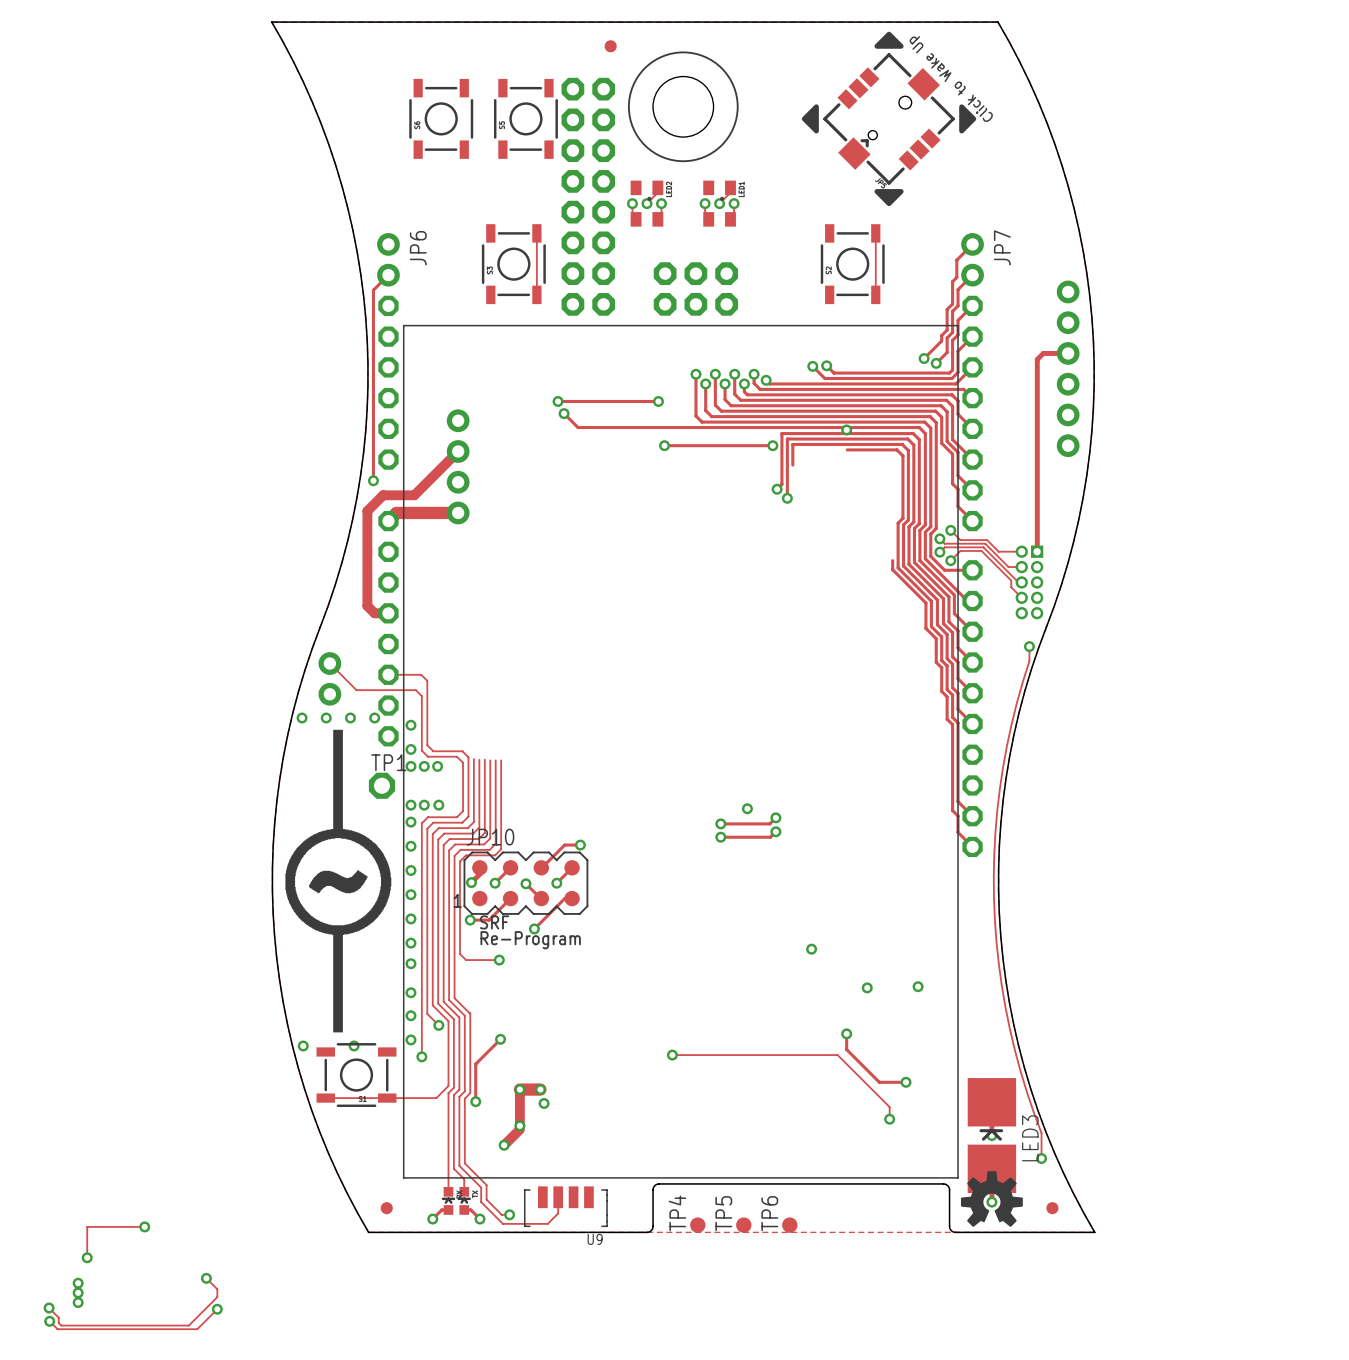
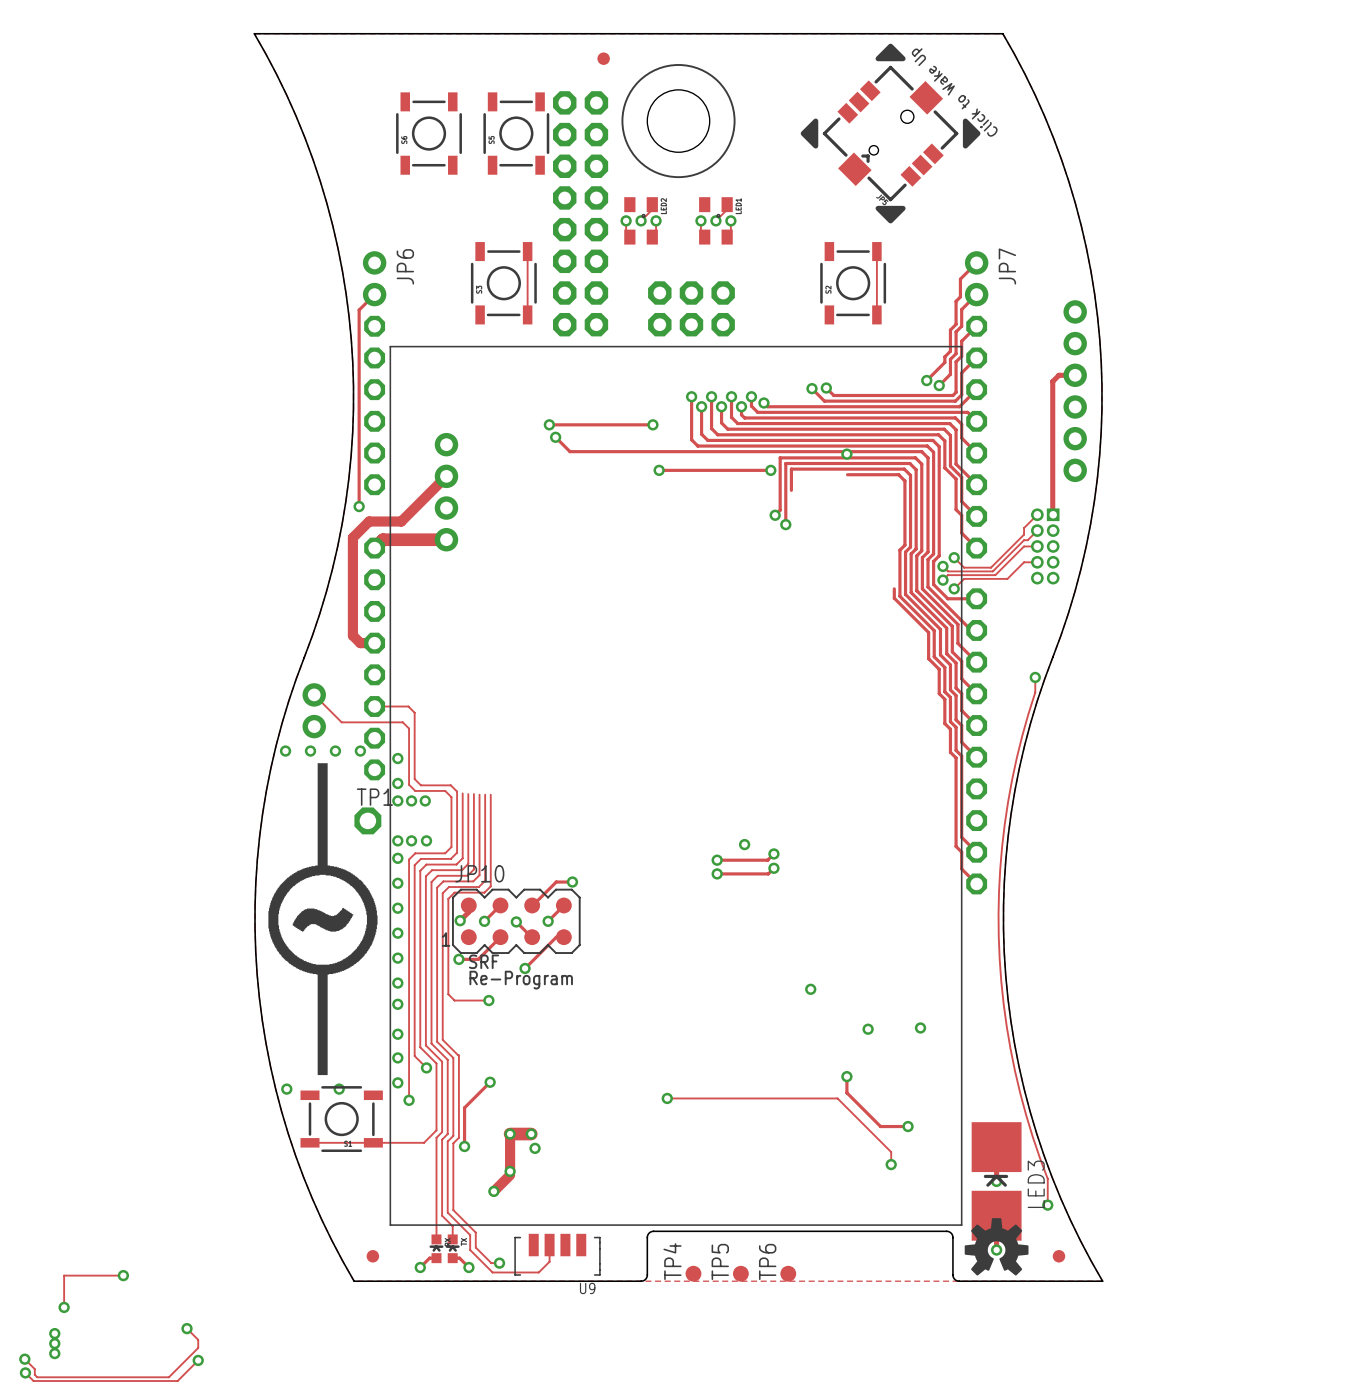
track: (1052, 353) (1043, 353) (1037, 359) (1037, 551) -> (1058, 375) (1052, 381) (1052, 514)
track: (986, 540) (998, 551) (1021, 551) -> (990, 567) (1024, 534) (1024, 528) (1037, 514)
track: (985, 543) (1008, 567) (1021, 567) -> (989, 571) (992, 571) (1024, 540) (1027, 540) (1037, 530)
track: (983, 547) (1018, 582) (1021, 582) -> (987, 575) (995, 575) (1024, 546) (1037, 546)
track: (981, 550) (1011, 580) (1011, 587) (1021, 597) -> (986, 578) (1007, 578) (1024, 562) (1037, 562)
part position: (1029, 582) -> (1045, 546)

